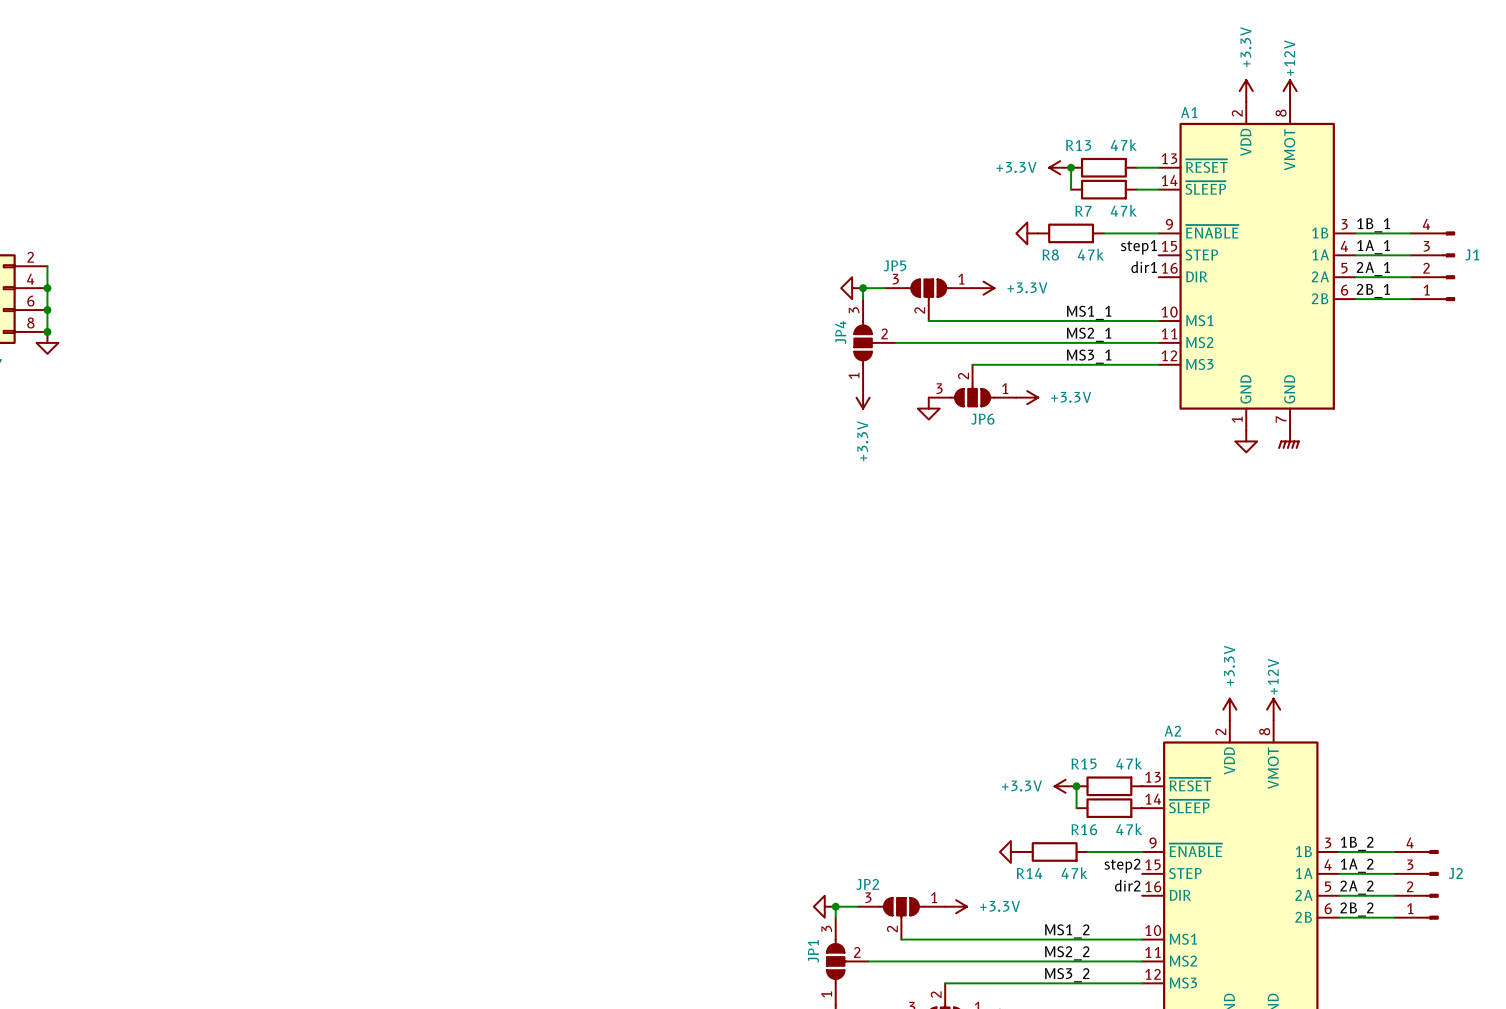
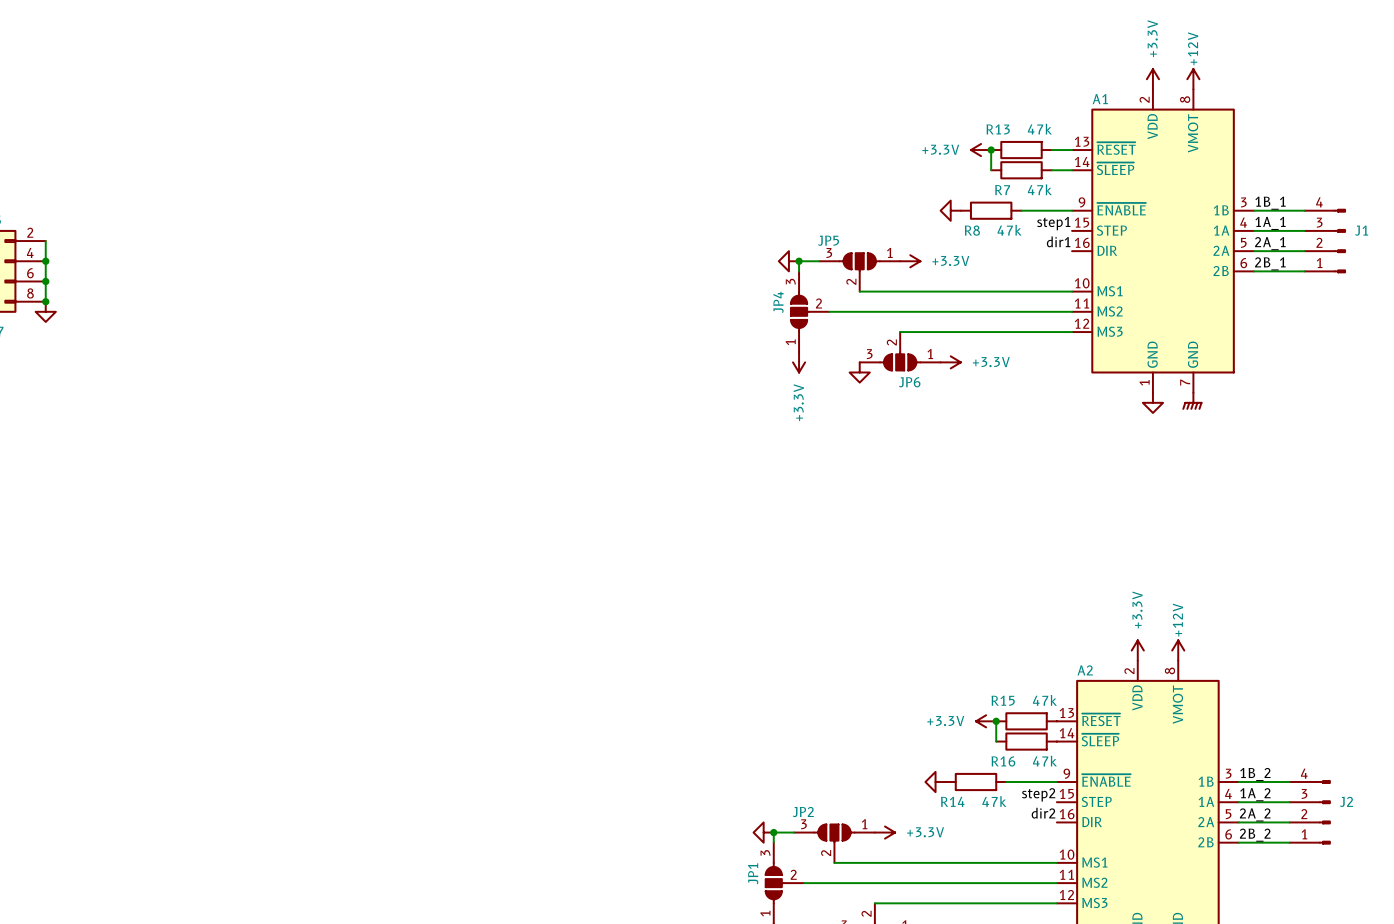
label: MS1_1 (1089, 312) -> none
label: MS2_1 (1089, 334) -> none
label: MS3_1 (1089, 356) -> none
label: MS1_2 (1067, 931) -> none
label: MS2_2 (1067, 953) -> none
label: MS3_2 (1067, 975) -> none

